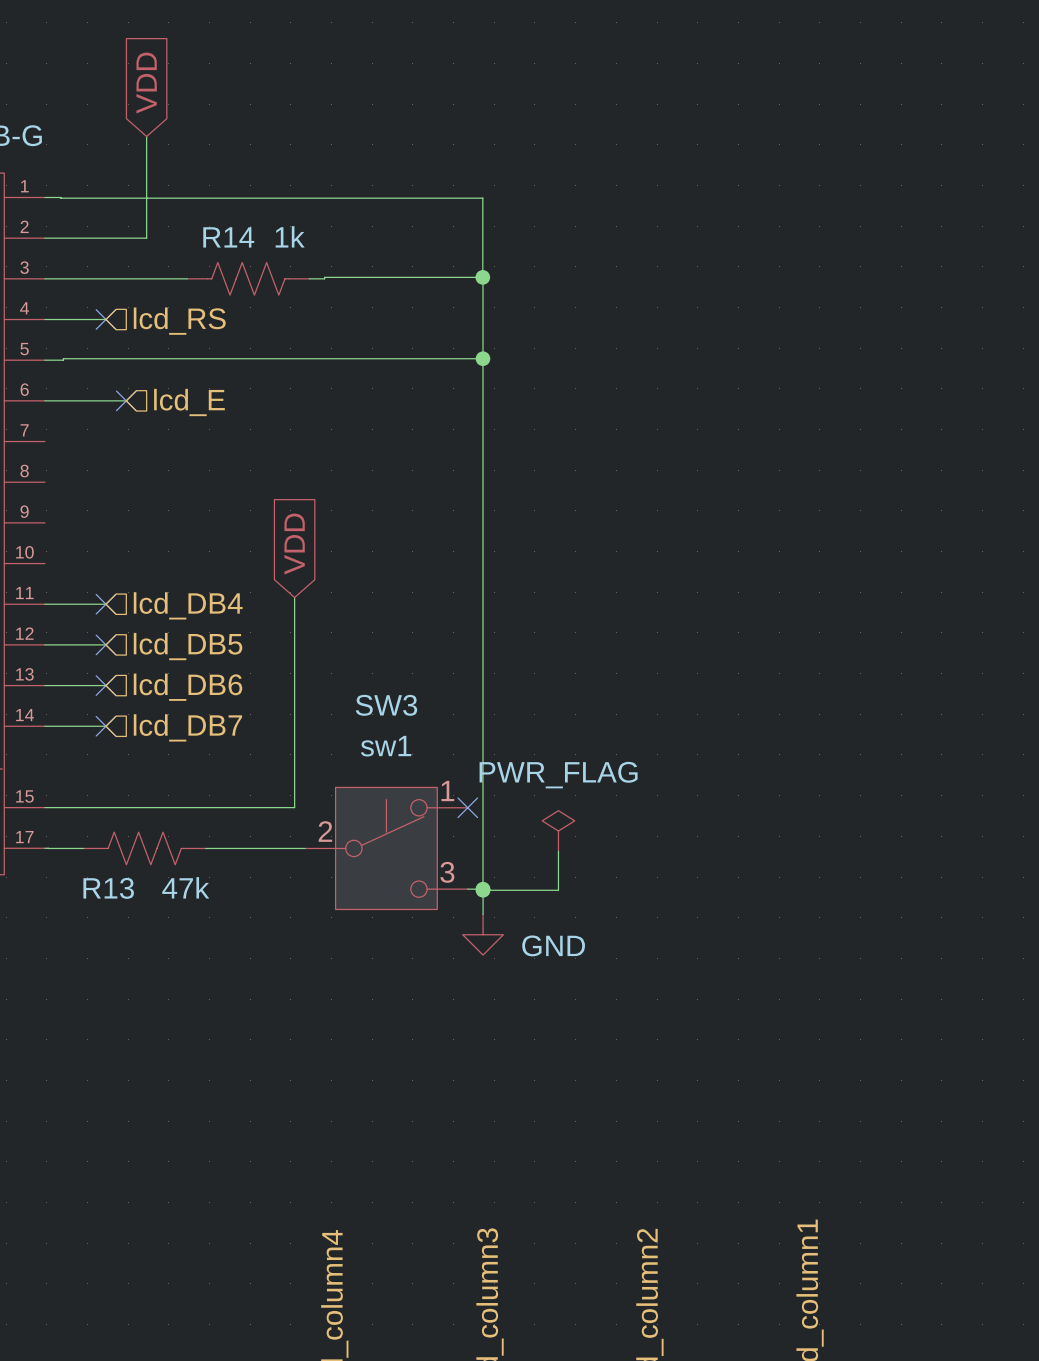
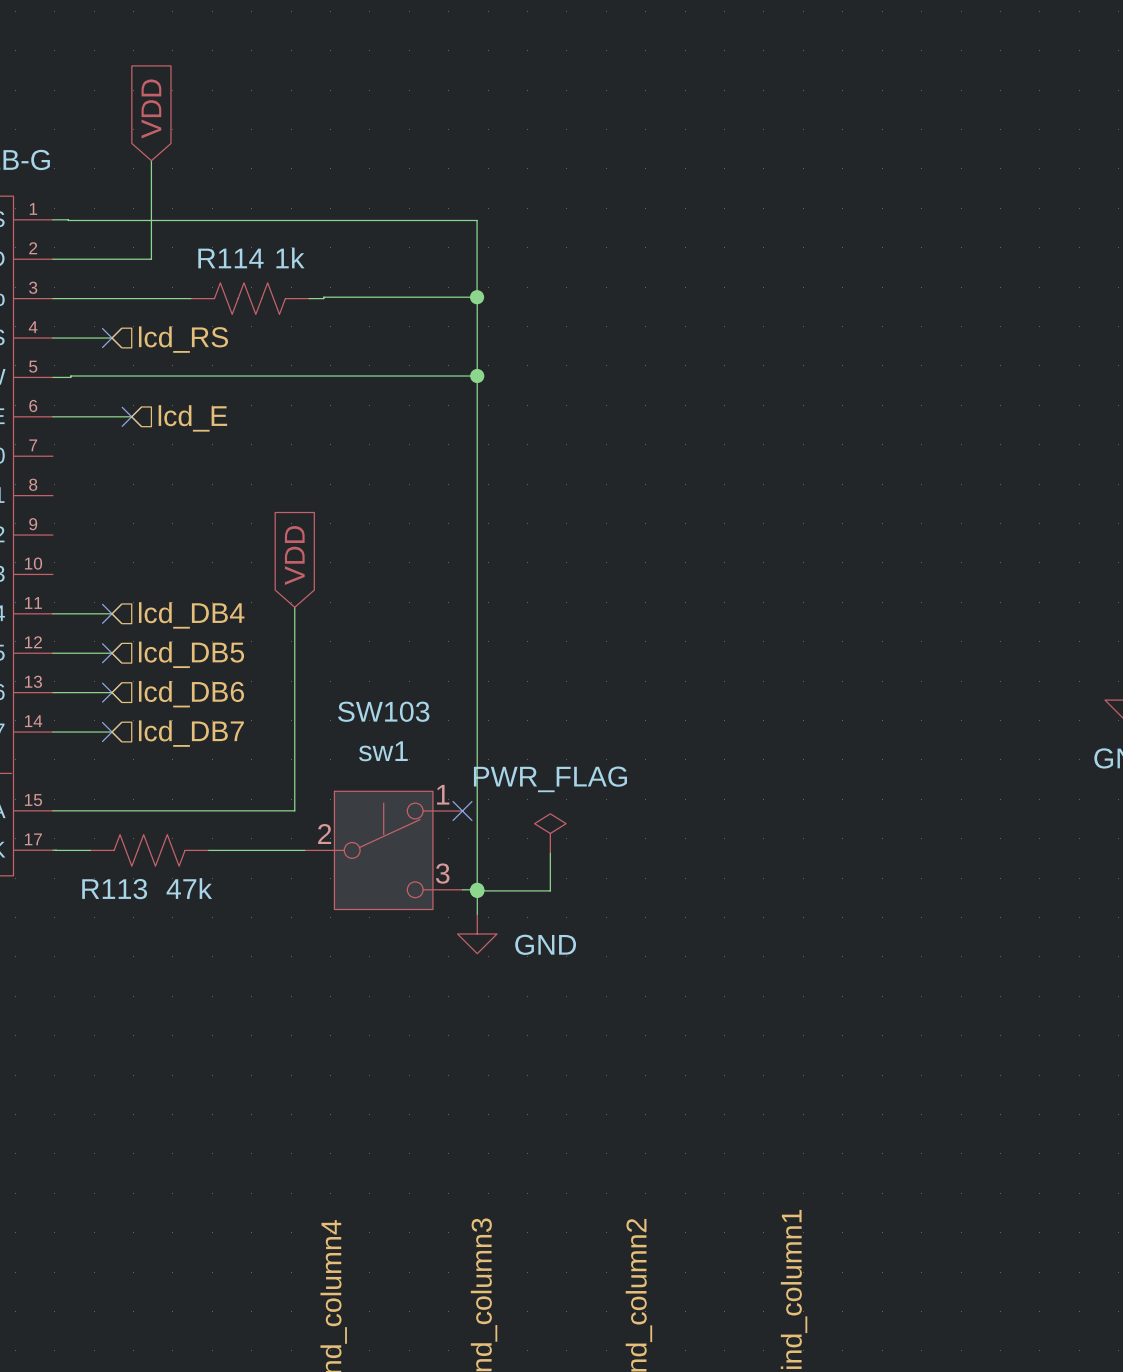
R14 name: R14 (228, 237) -> R114 (230, 258)
SW3 name: SW3 (386, 705) -> SW103 (383, 711)
R13 name: R13 (108, 888) -> R113 (114, 889)

